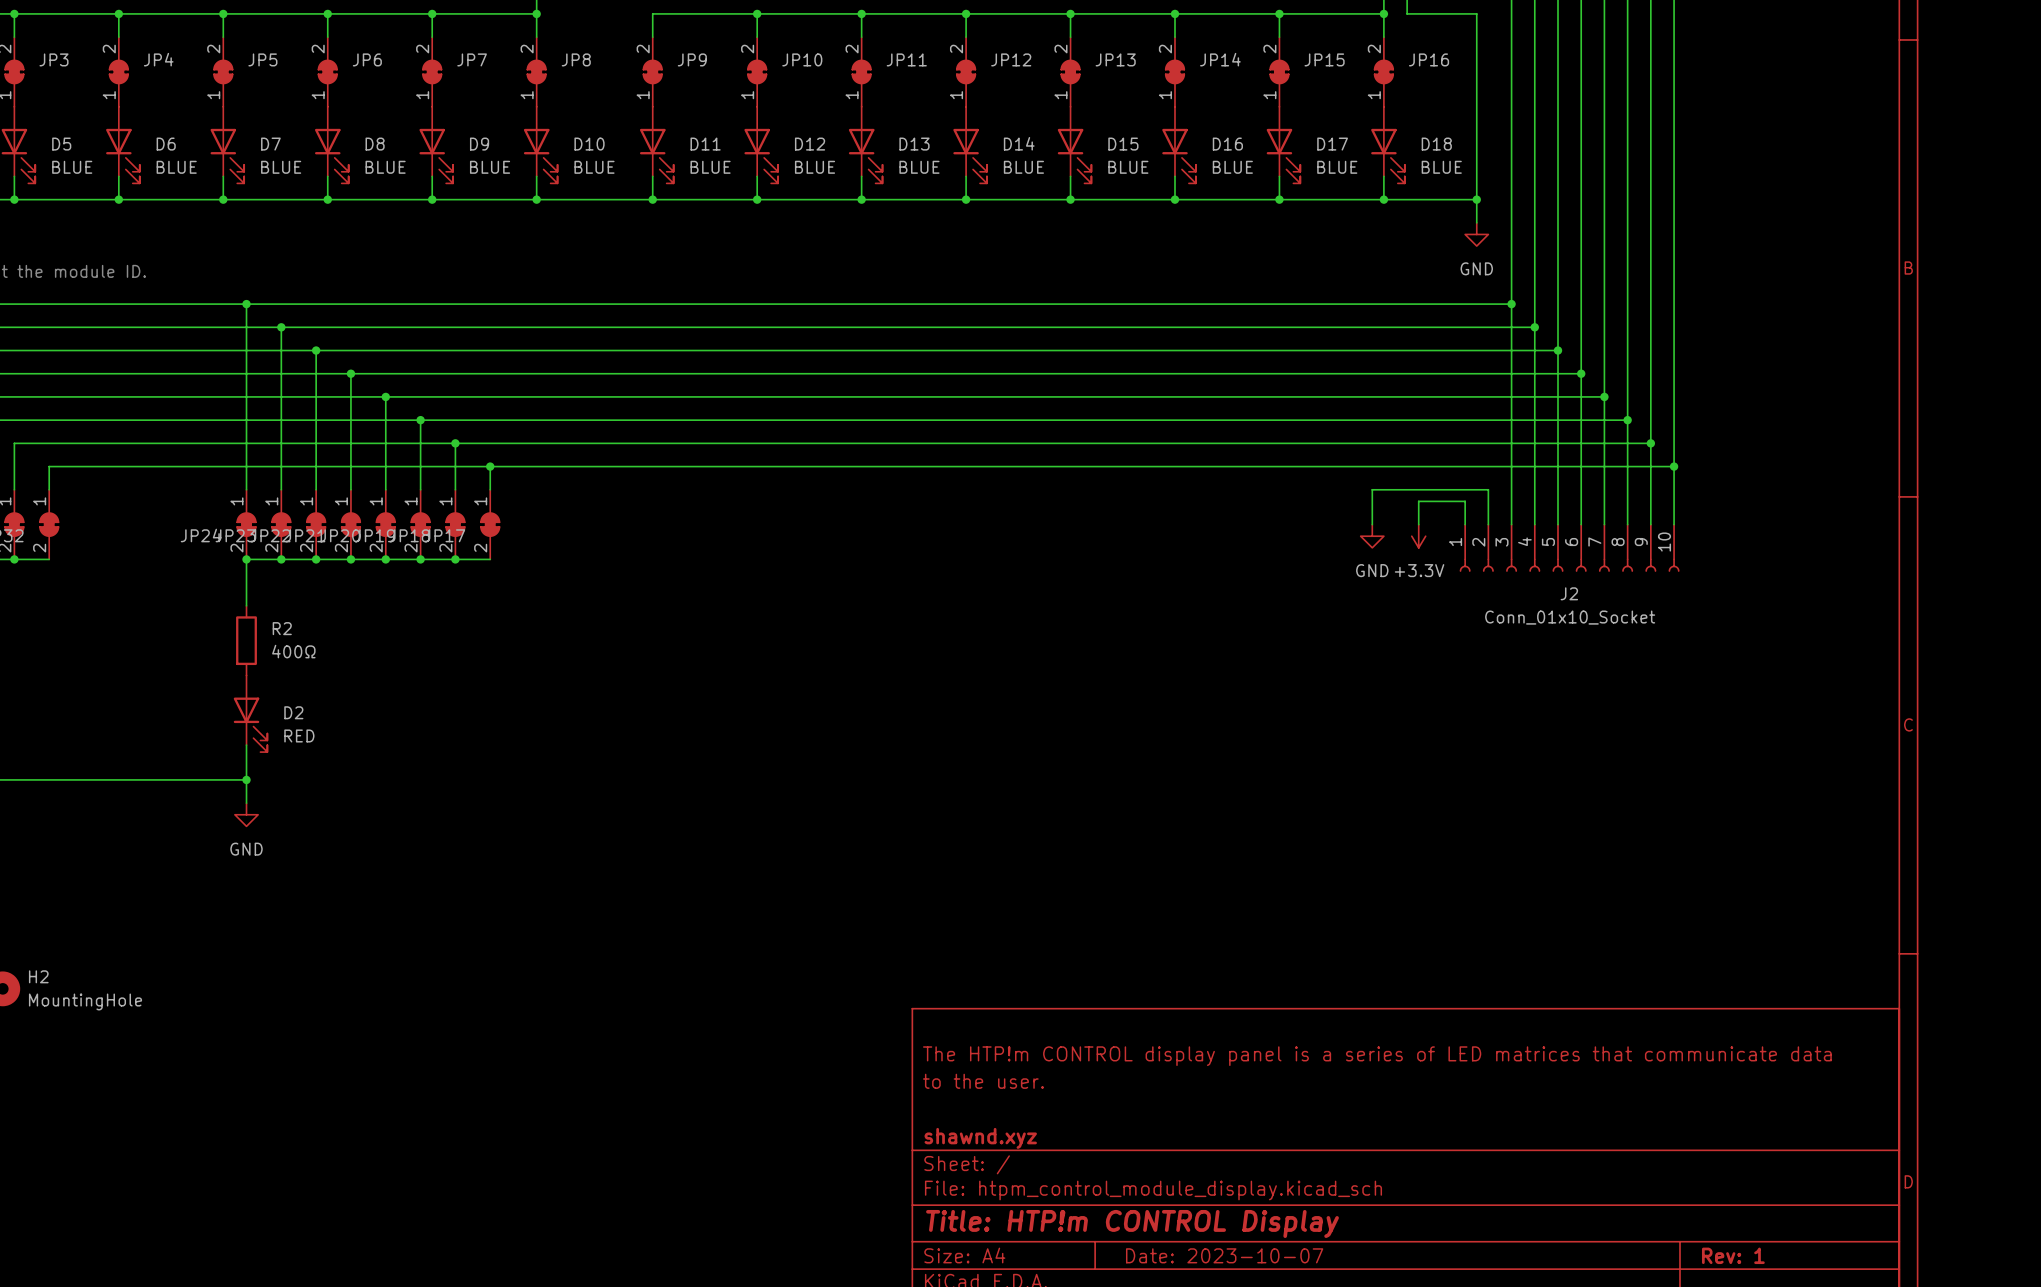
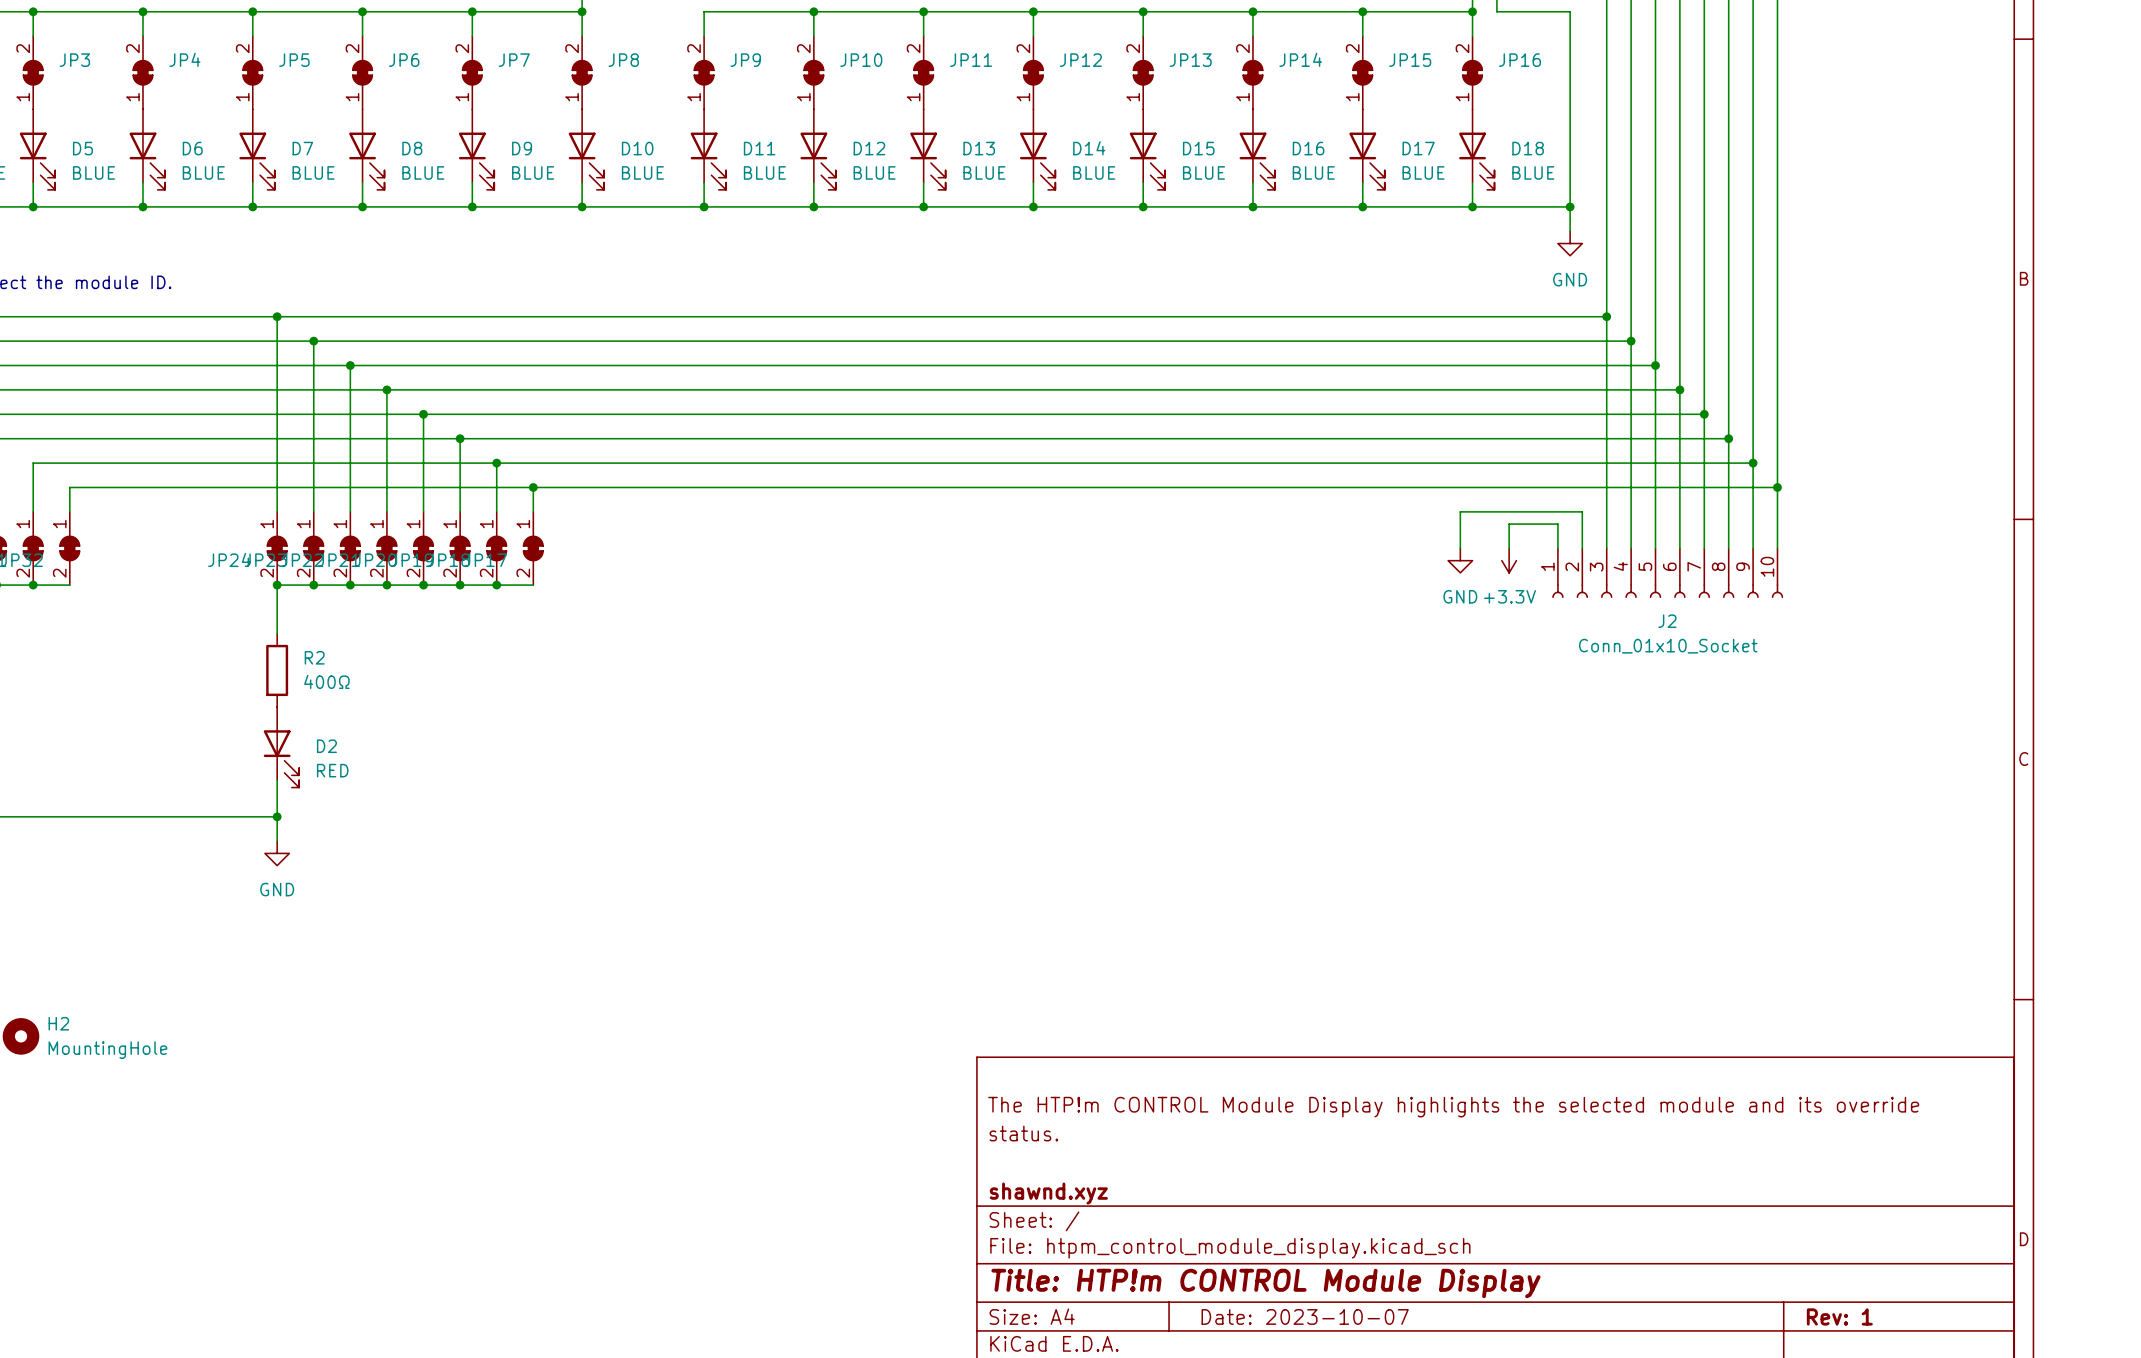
title block: The HTP!m CONTROL display panel is a series of LED matrices that communicate data (1377, 1056) -> The HTP!m CONTROL Module Display highlights the selected module and its override (1453, 1107)
title block: to the user. (983, 1081) -> status. (1023, 1133)
title block: Title: HTP!m CONTROL Display (1132, 1223) -> Title: HTP!m CONTROL Module Display (1265, 1283)

